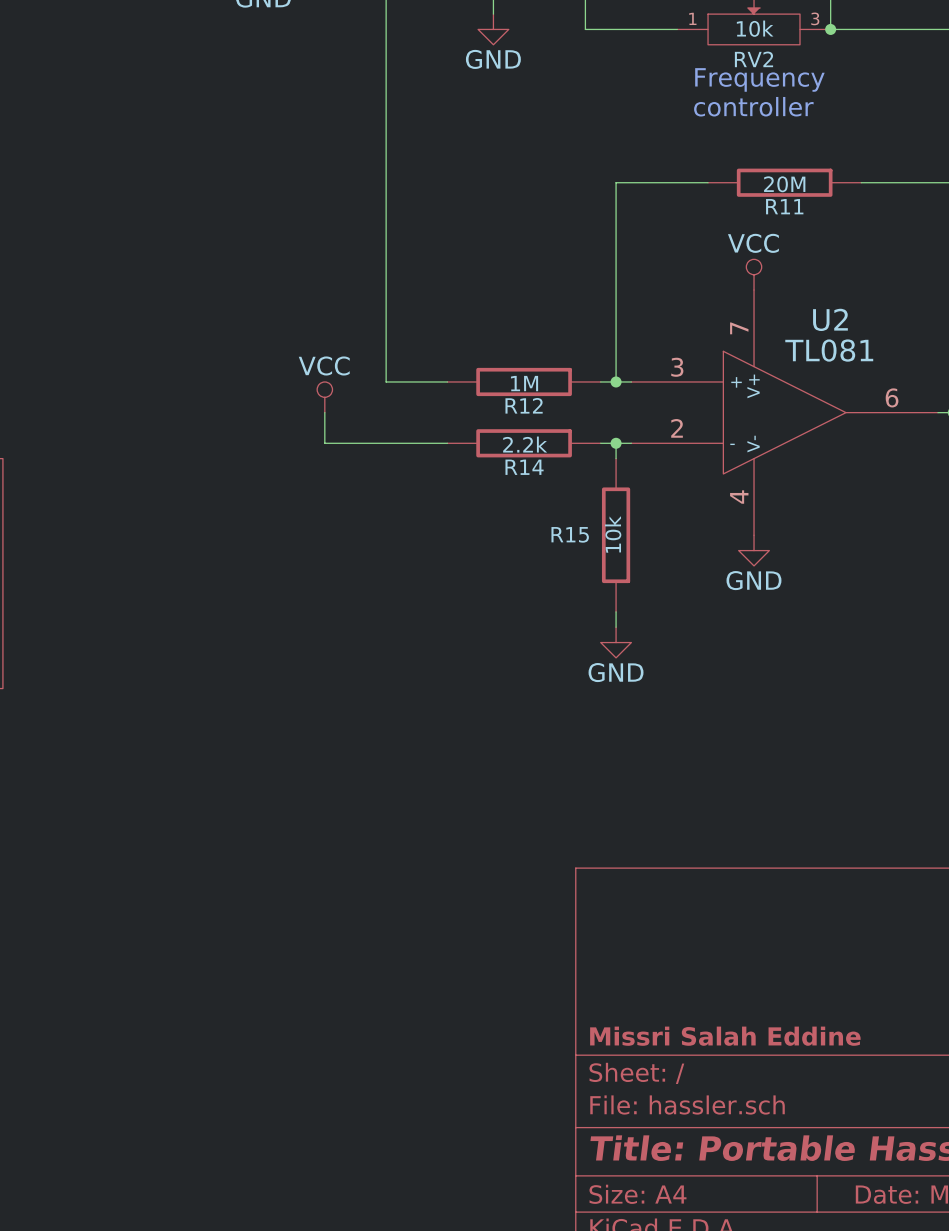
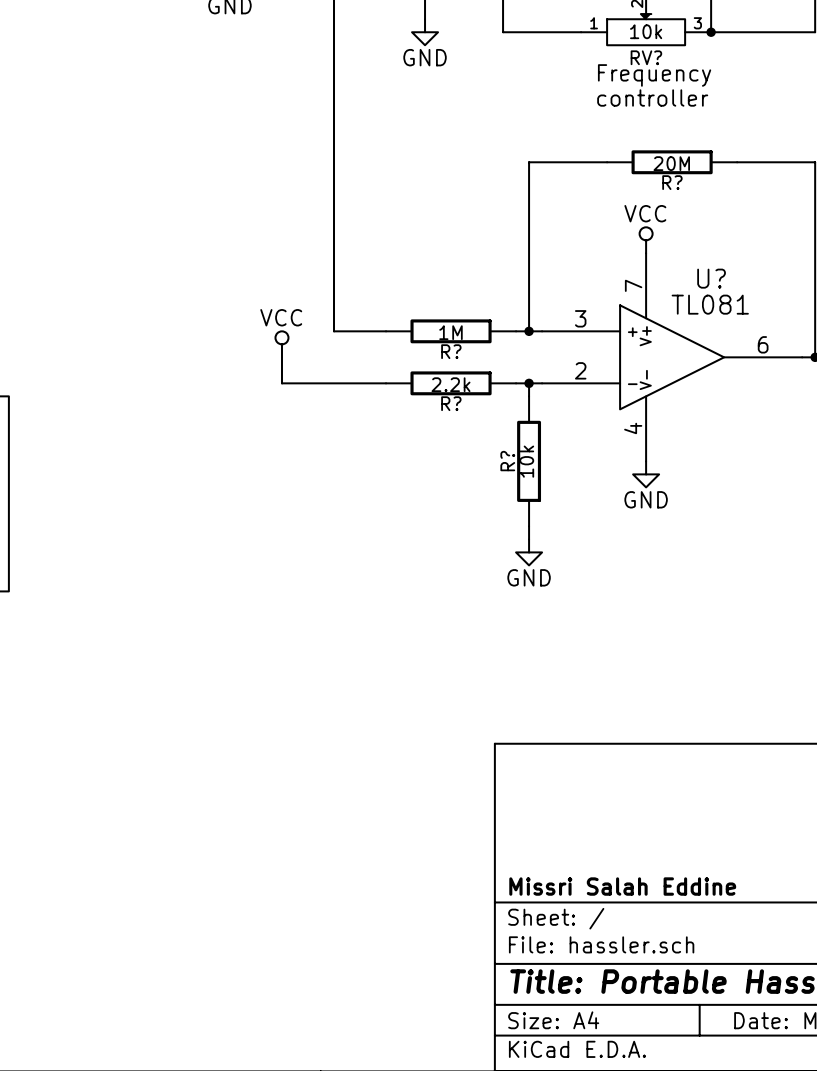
RV2 name: RV2 (753, 59) -> RV? (646, 57)
R11 name: R11 (784, 206) -> R? (672, 182)
U2 name: U2 (830, 319) -> U? (711, 278)
R12 name: R12 (524, 405) -> R? (451, 351)
R14 name: R14 (524, 467) -> R? (451, 403)
R15 name: R15 (570, 534) -> R? (507, 461)

